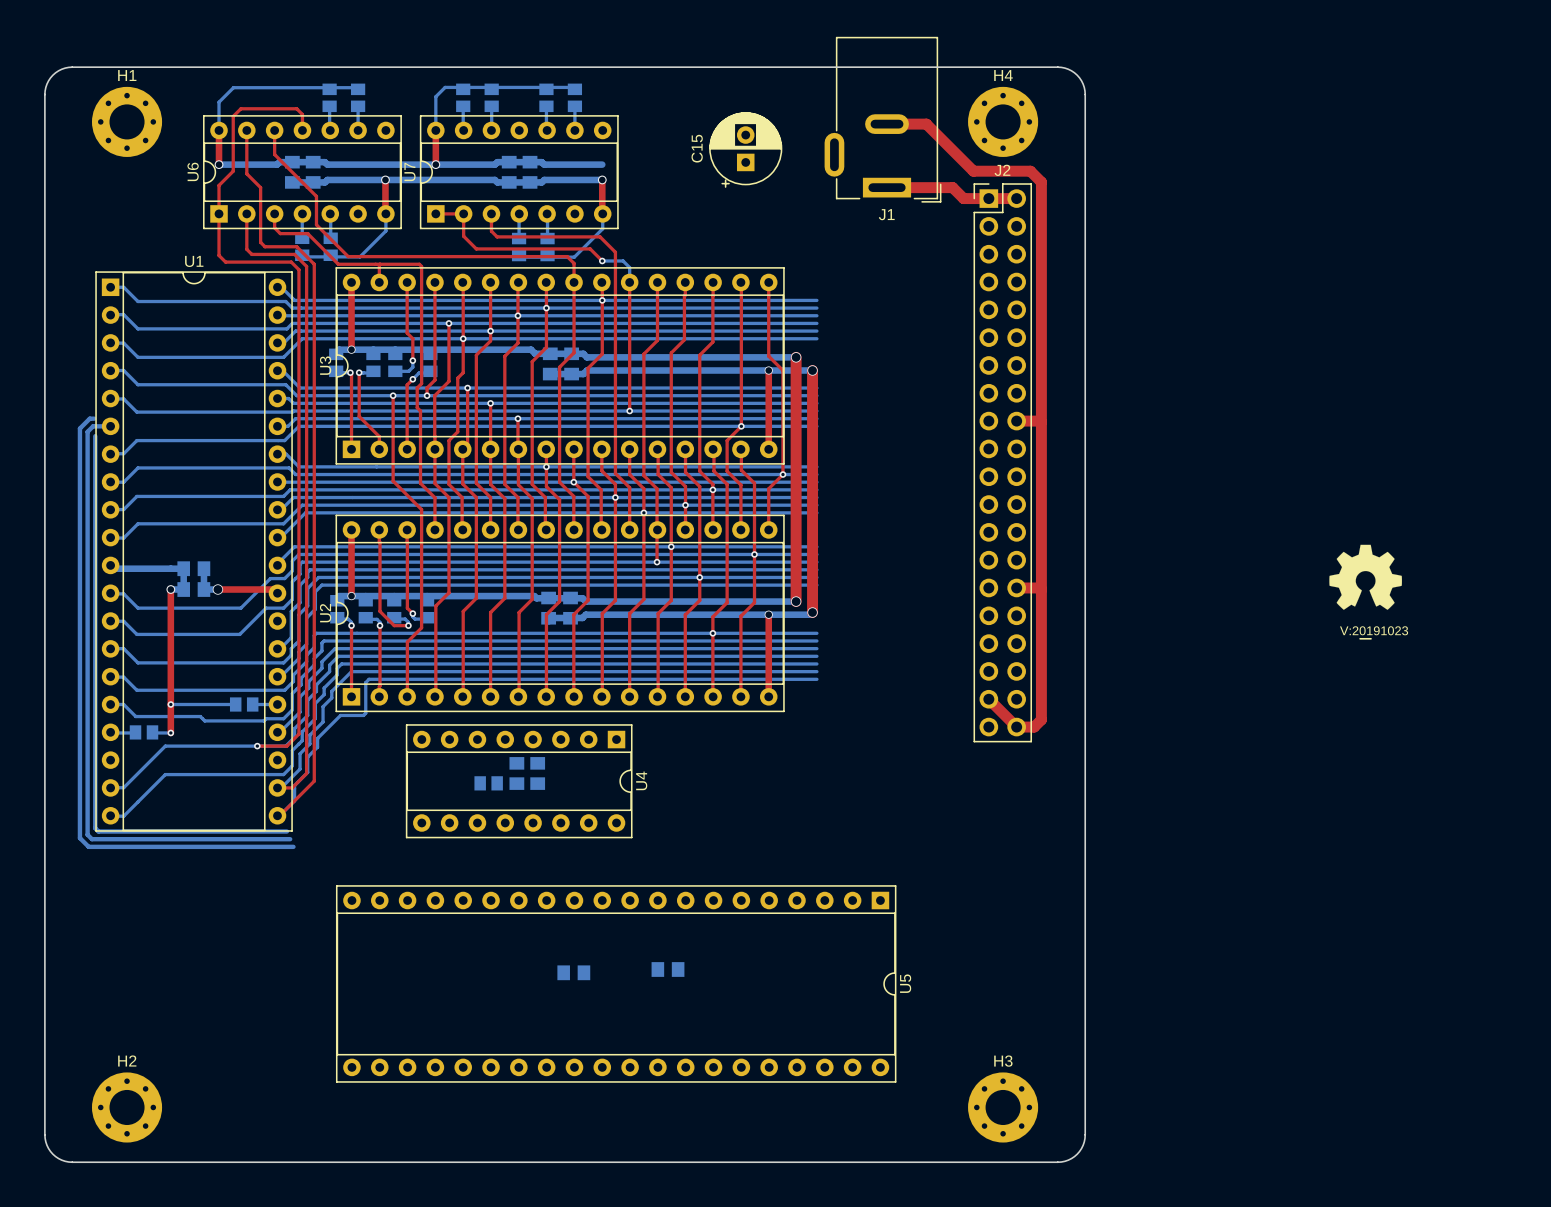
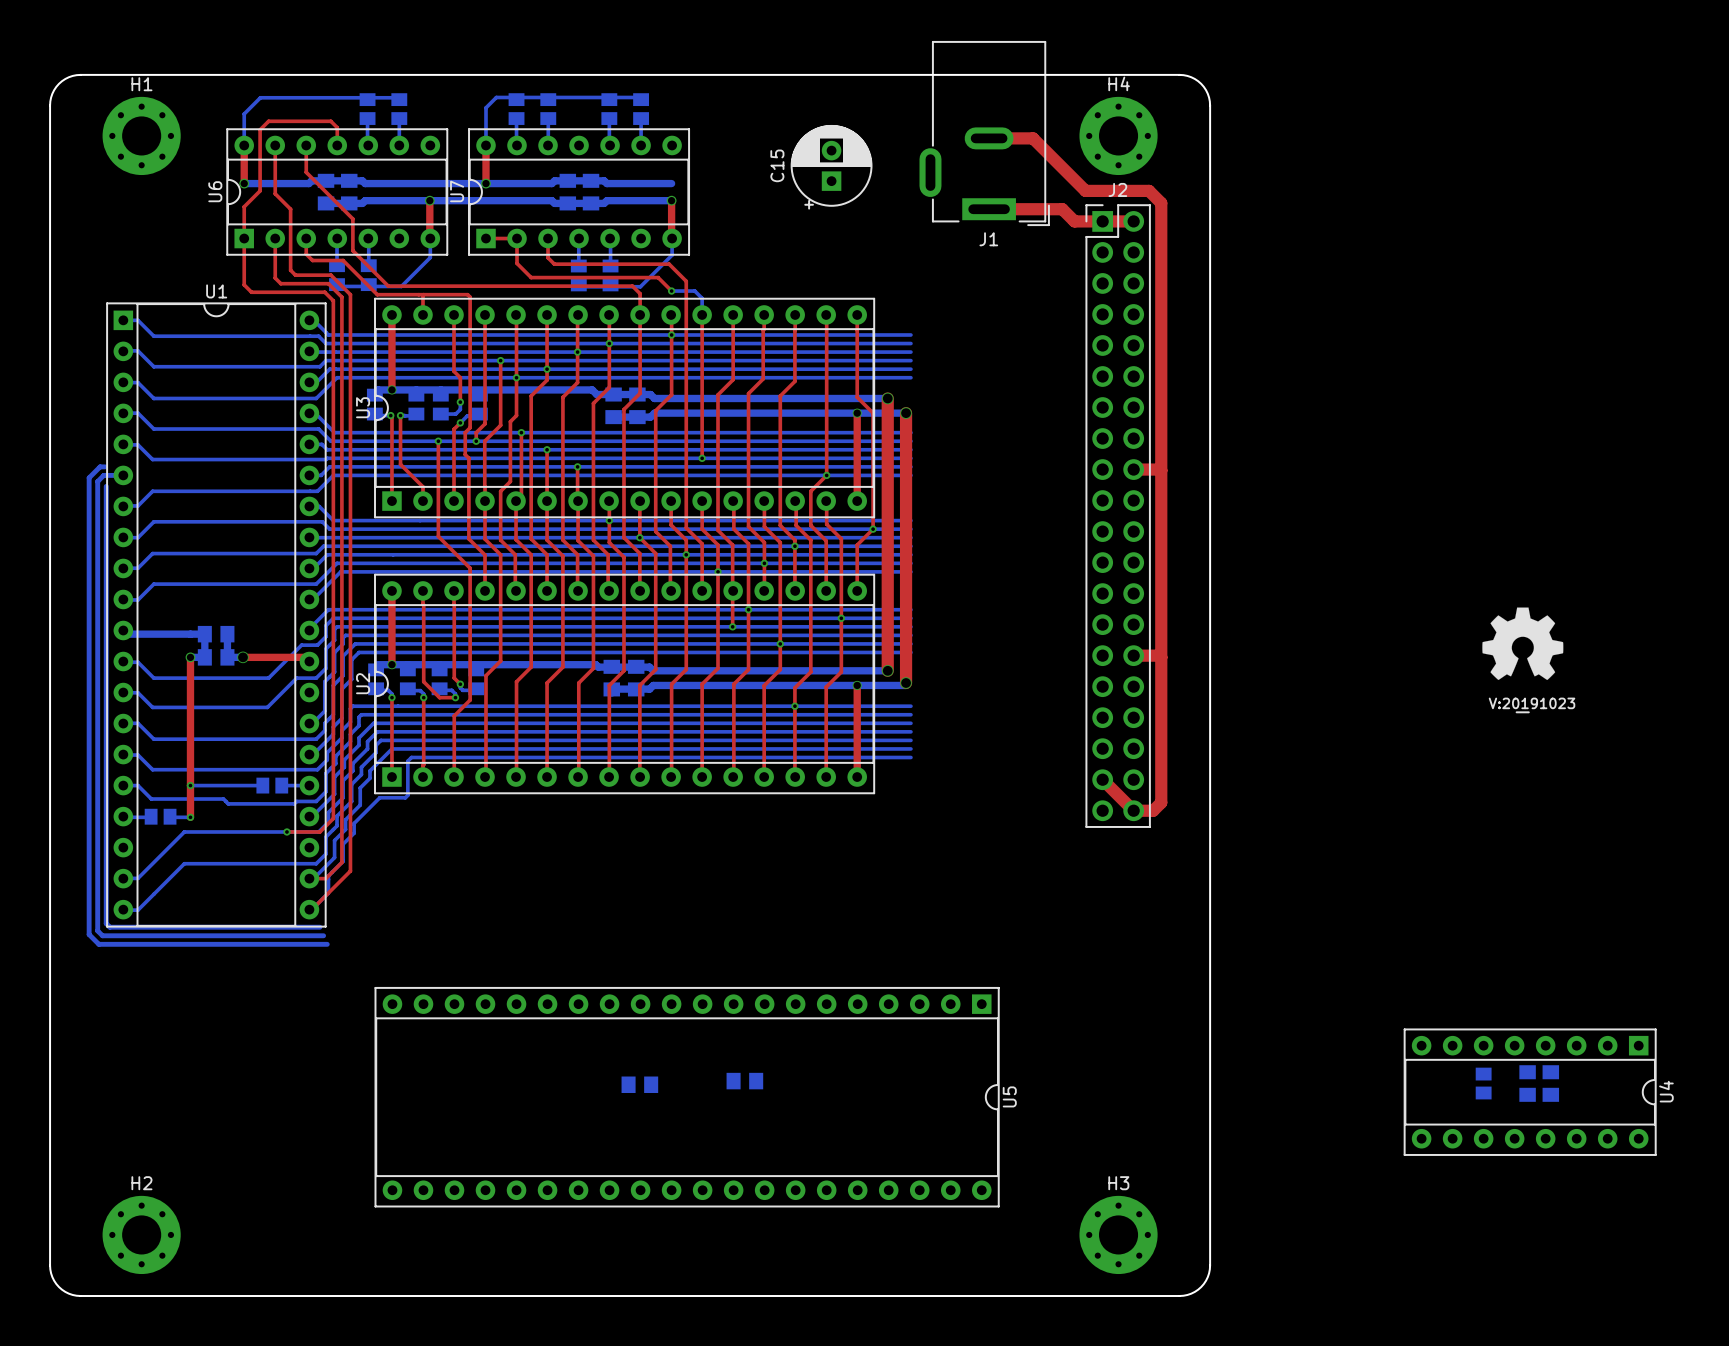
part: (516, 773) -> none
part: (537, 773) -> none
U4 position: (519, 781) -> (1530, 1092)
part: (488, 783) -> none
part: none -> (1483, 1083)
part: none -> (1527, 1083)
part: none -> (1550, 1083)

